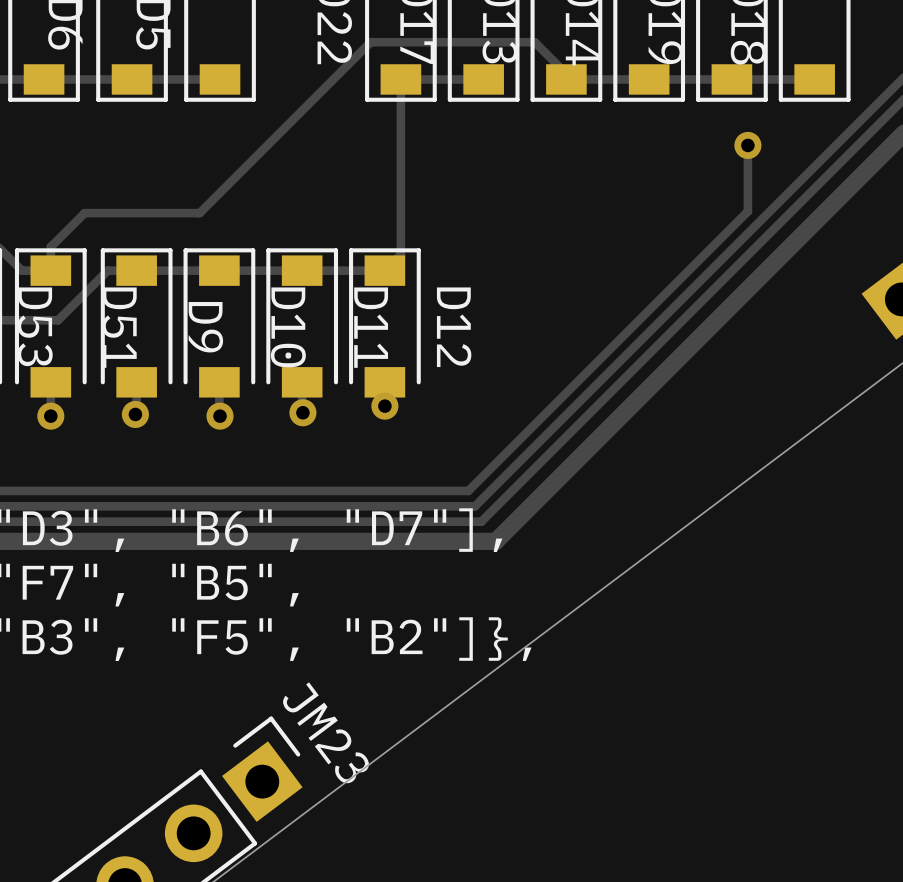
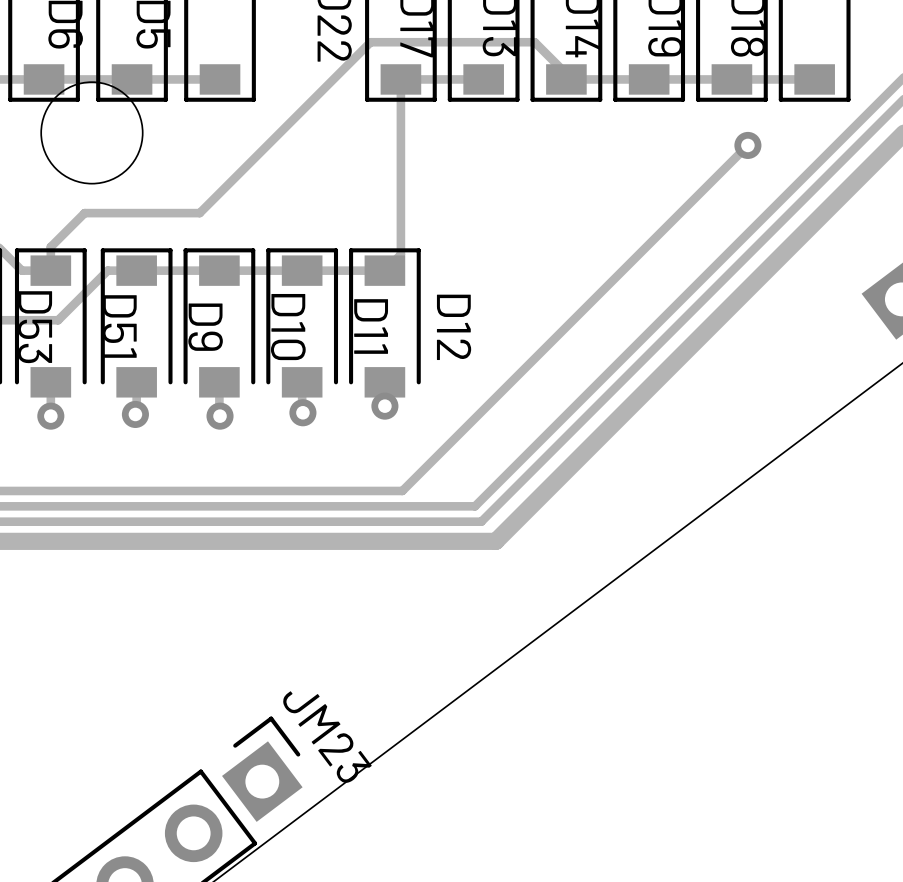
round board edge: none -> [40, 81, 144, 185]
track: (747, 145) (747, 211) (468, 490) (402, 490) -> (747, 145) (402, 490)

